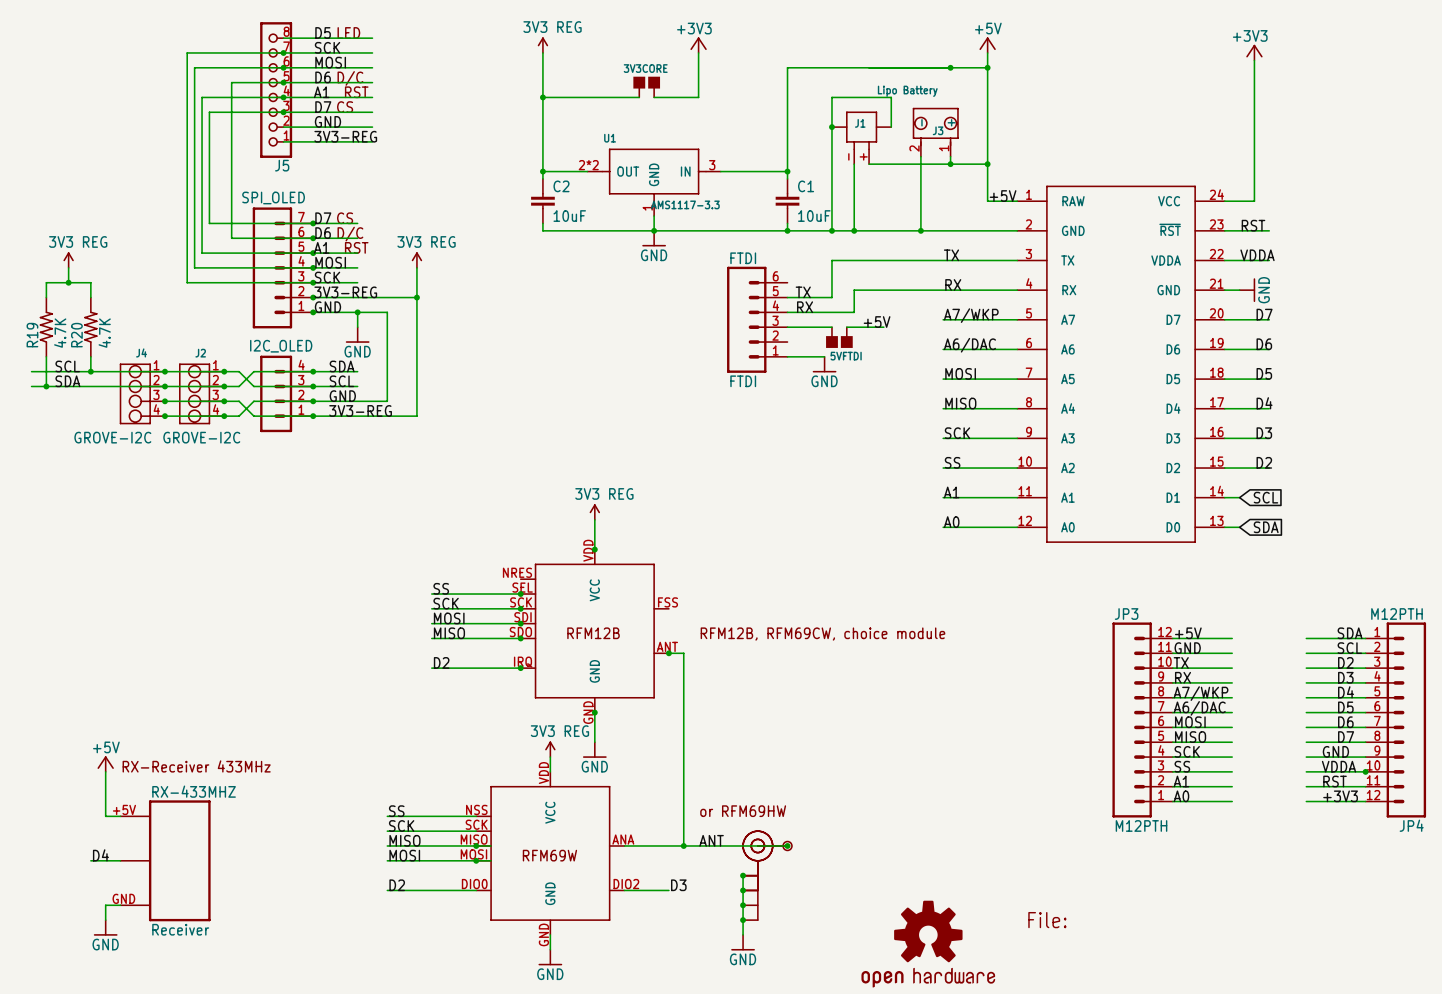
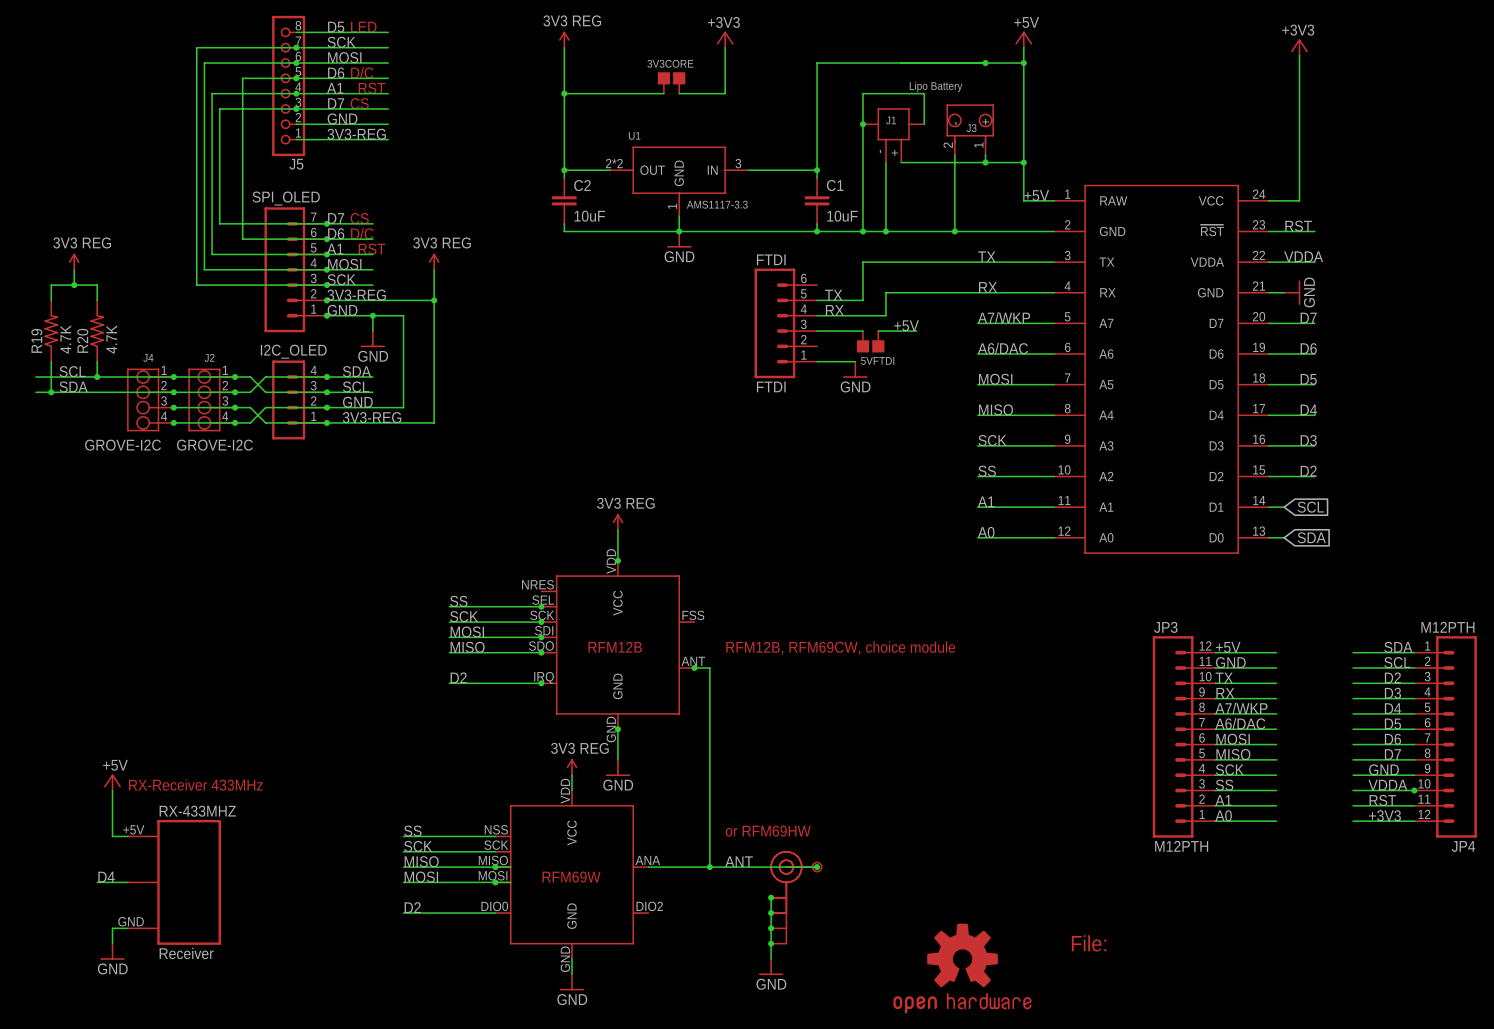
label: D3 (678, 885) -> none
wire: (624, 890) (668, 890) -> none

